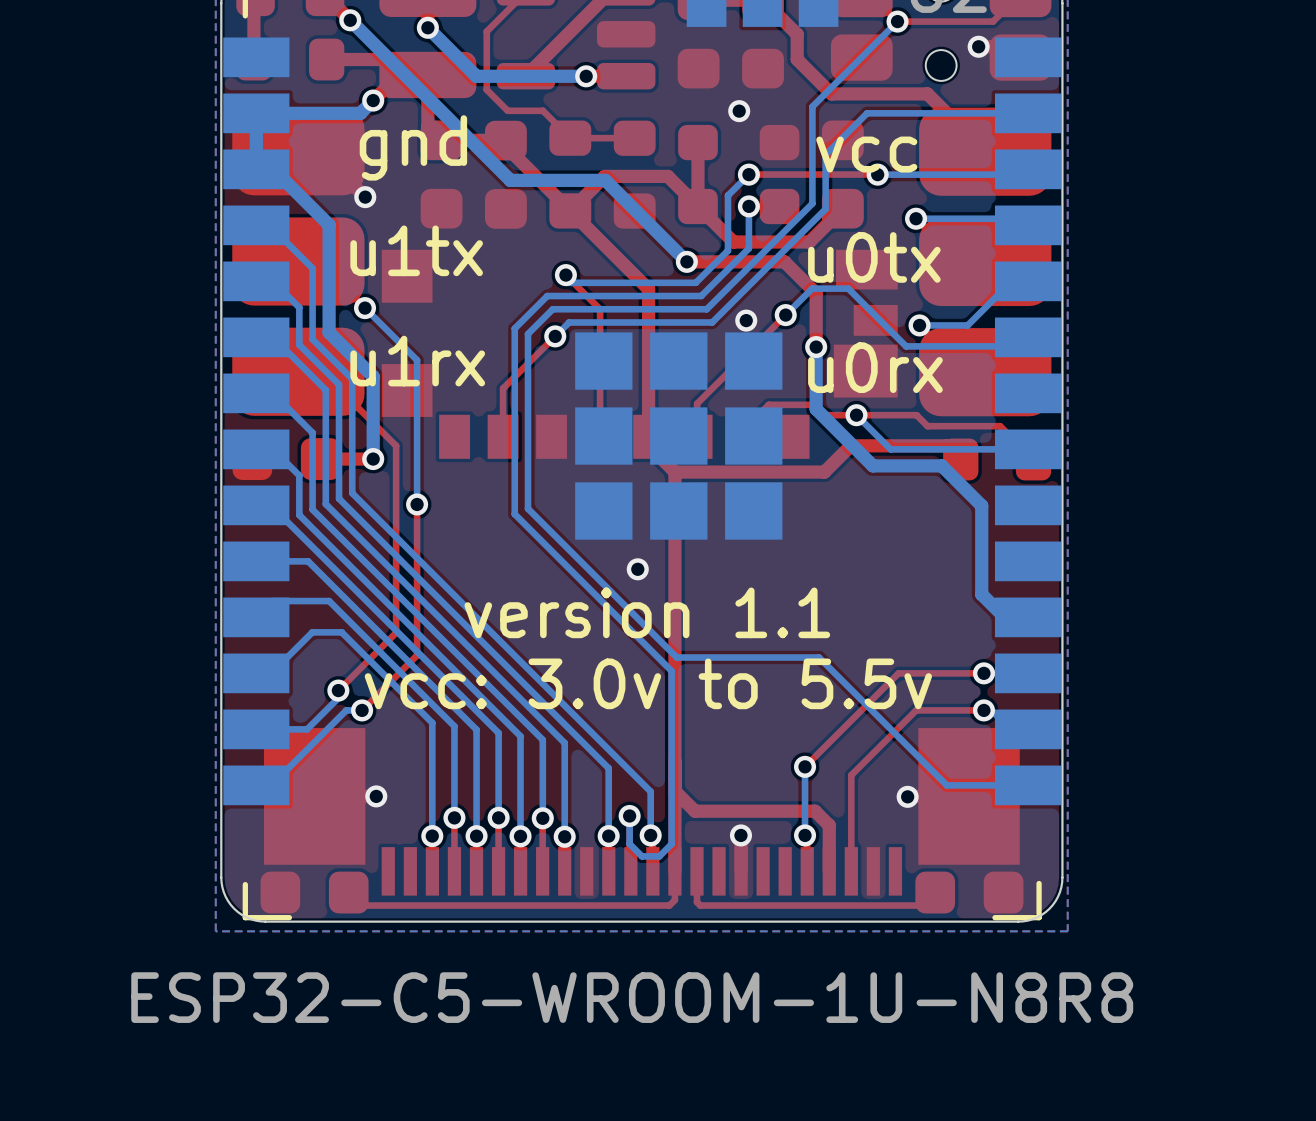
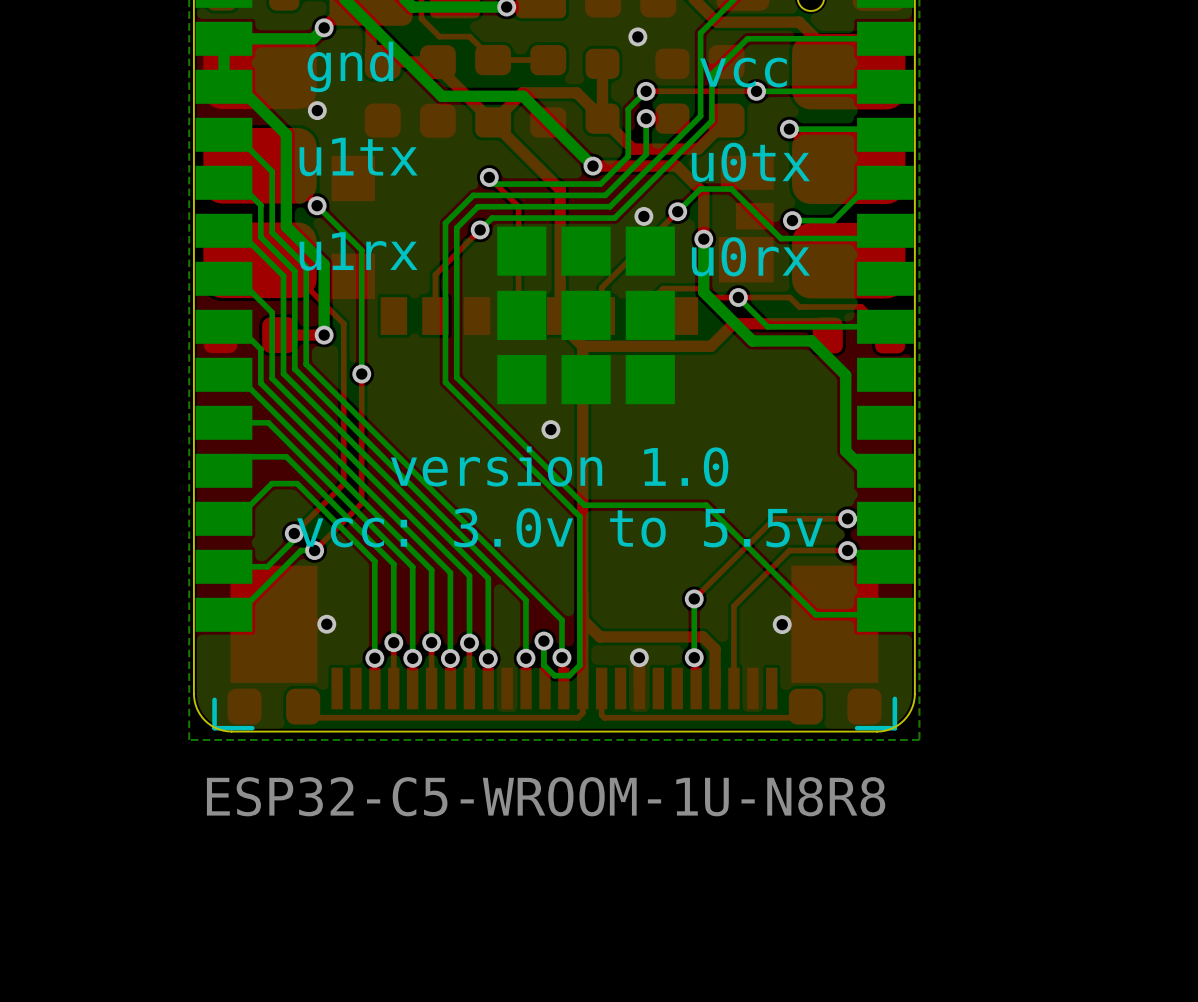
text: version 1.1 (647, 612) -> version 1.0 (559, 466)

